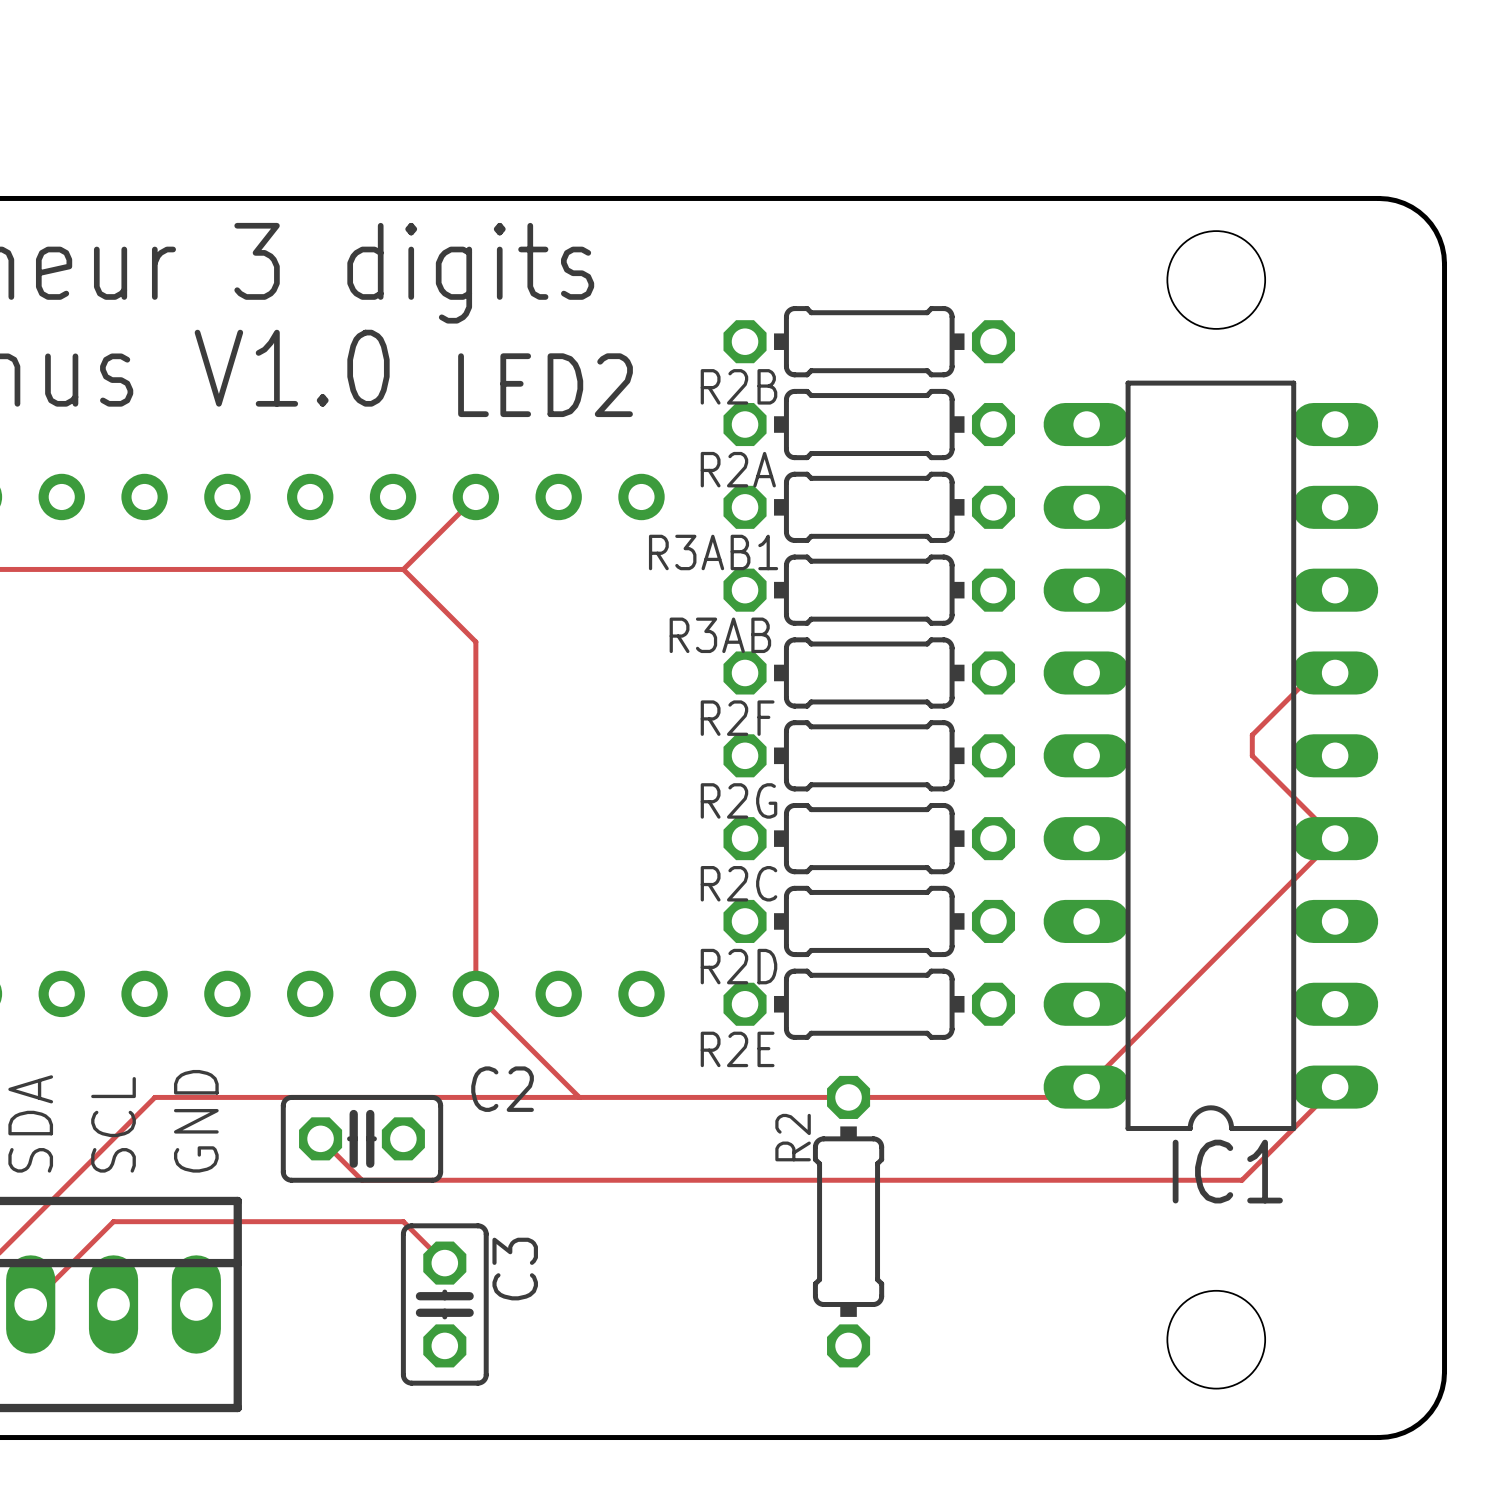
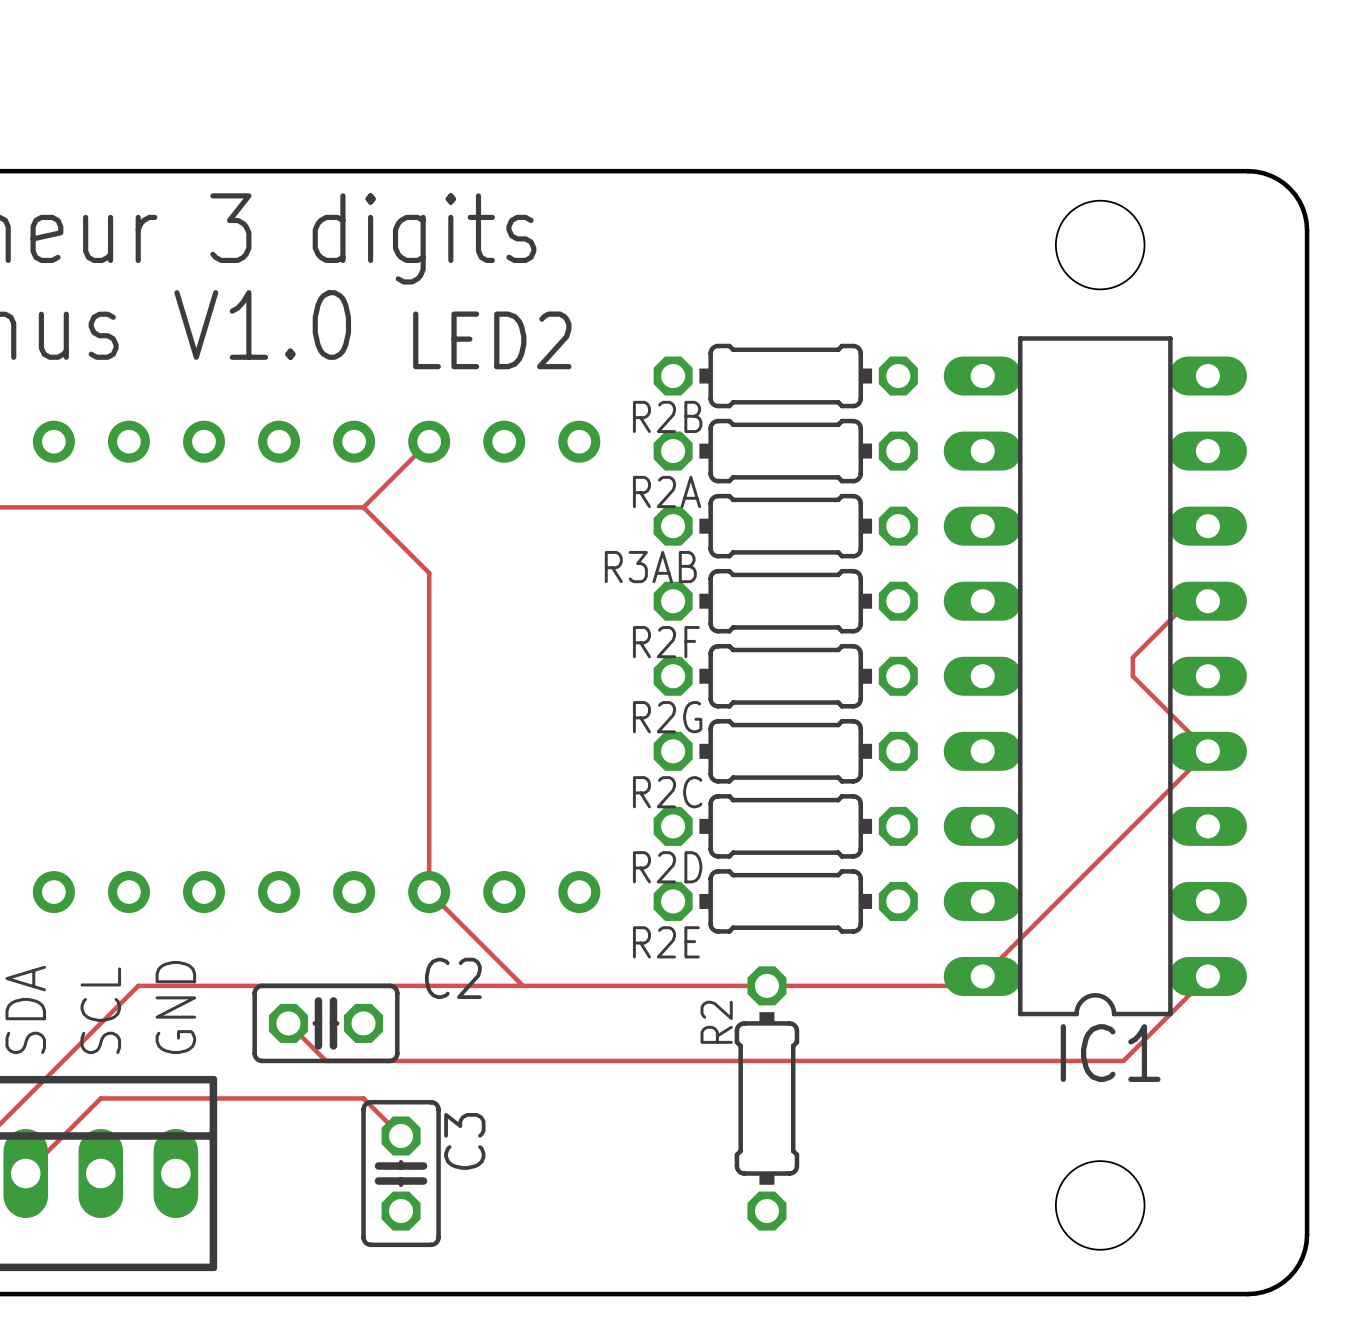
R2B: (869, 341) -> none
R2A name: R2A (738, 469) -> R2B (667, 416)
R3AB1 name: R3AB1 (713, 552) -> R2A (667, 491)

